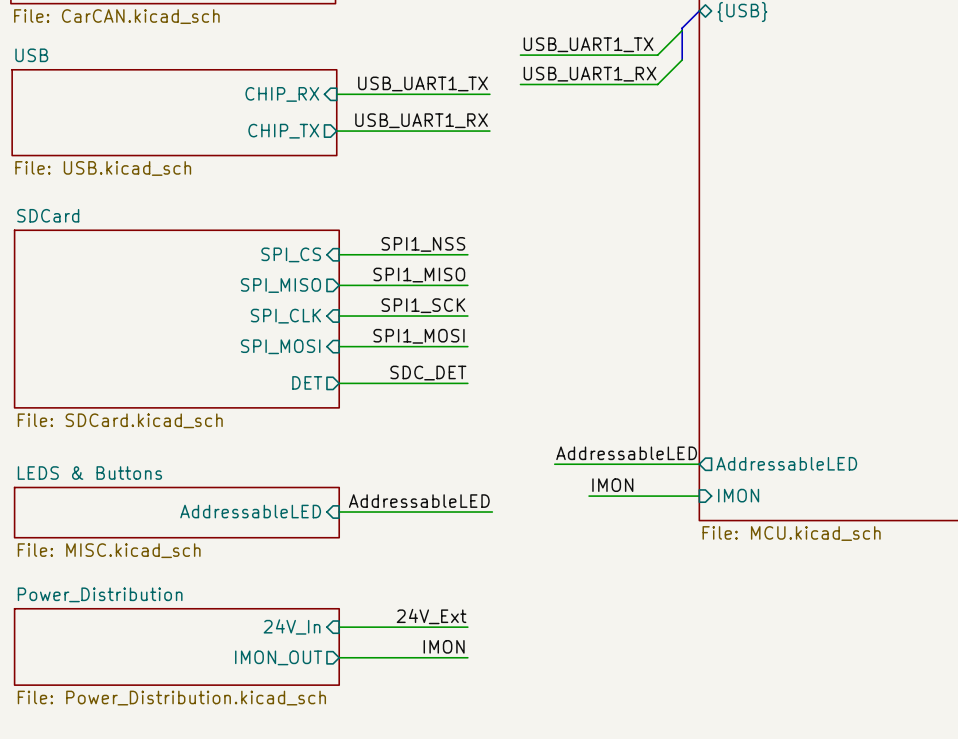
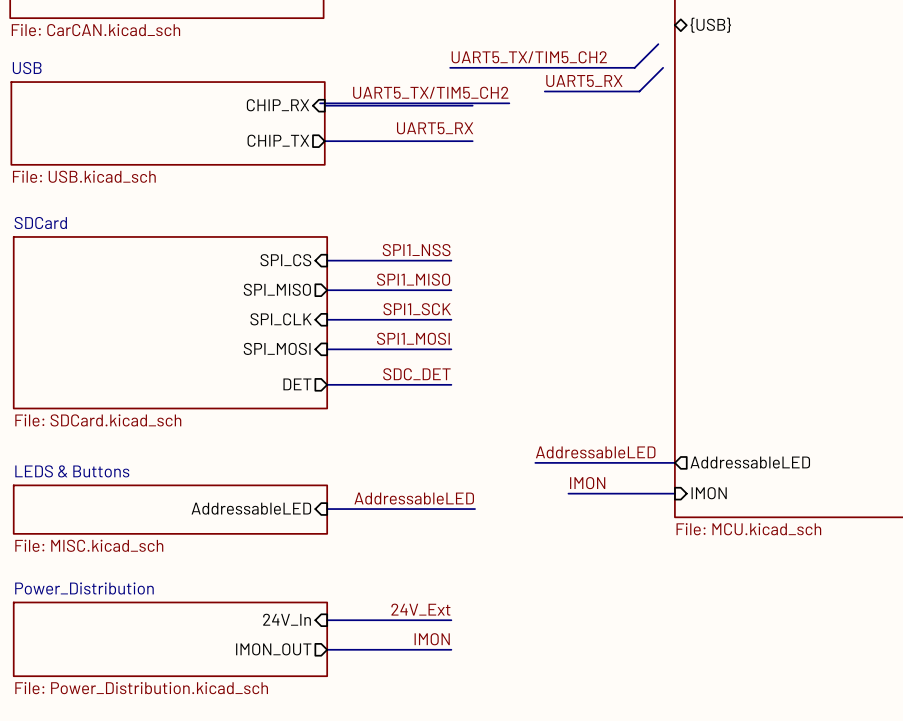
bus: (699, 11) (682, 28) (682, 60) -> none
label: USB_UART1_TX (588, 44) -> none
label: none -> UART5_TX/TIM5_CH2 (529, 57)
wire: none -> (450, 67) (502, 67)
wire: none -> (663, 67) (658, 72)
label: USB_UART1_RX (590, 74) -> UART5_RX (584, 81)
wire: (662, 79) (657, 84) (520, 84) -> (639, 91) (544, 91)
label: none -> UART5_TX/TIM5_CH2 (430, 92)
label: USB_UART1_TX (422, 83) -> none
wire: none -> (320, 103) (509, 103)
label: USB_UART1_RX (421, 120) -> UART5_RX (435, 128)

